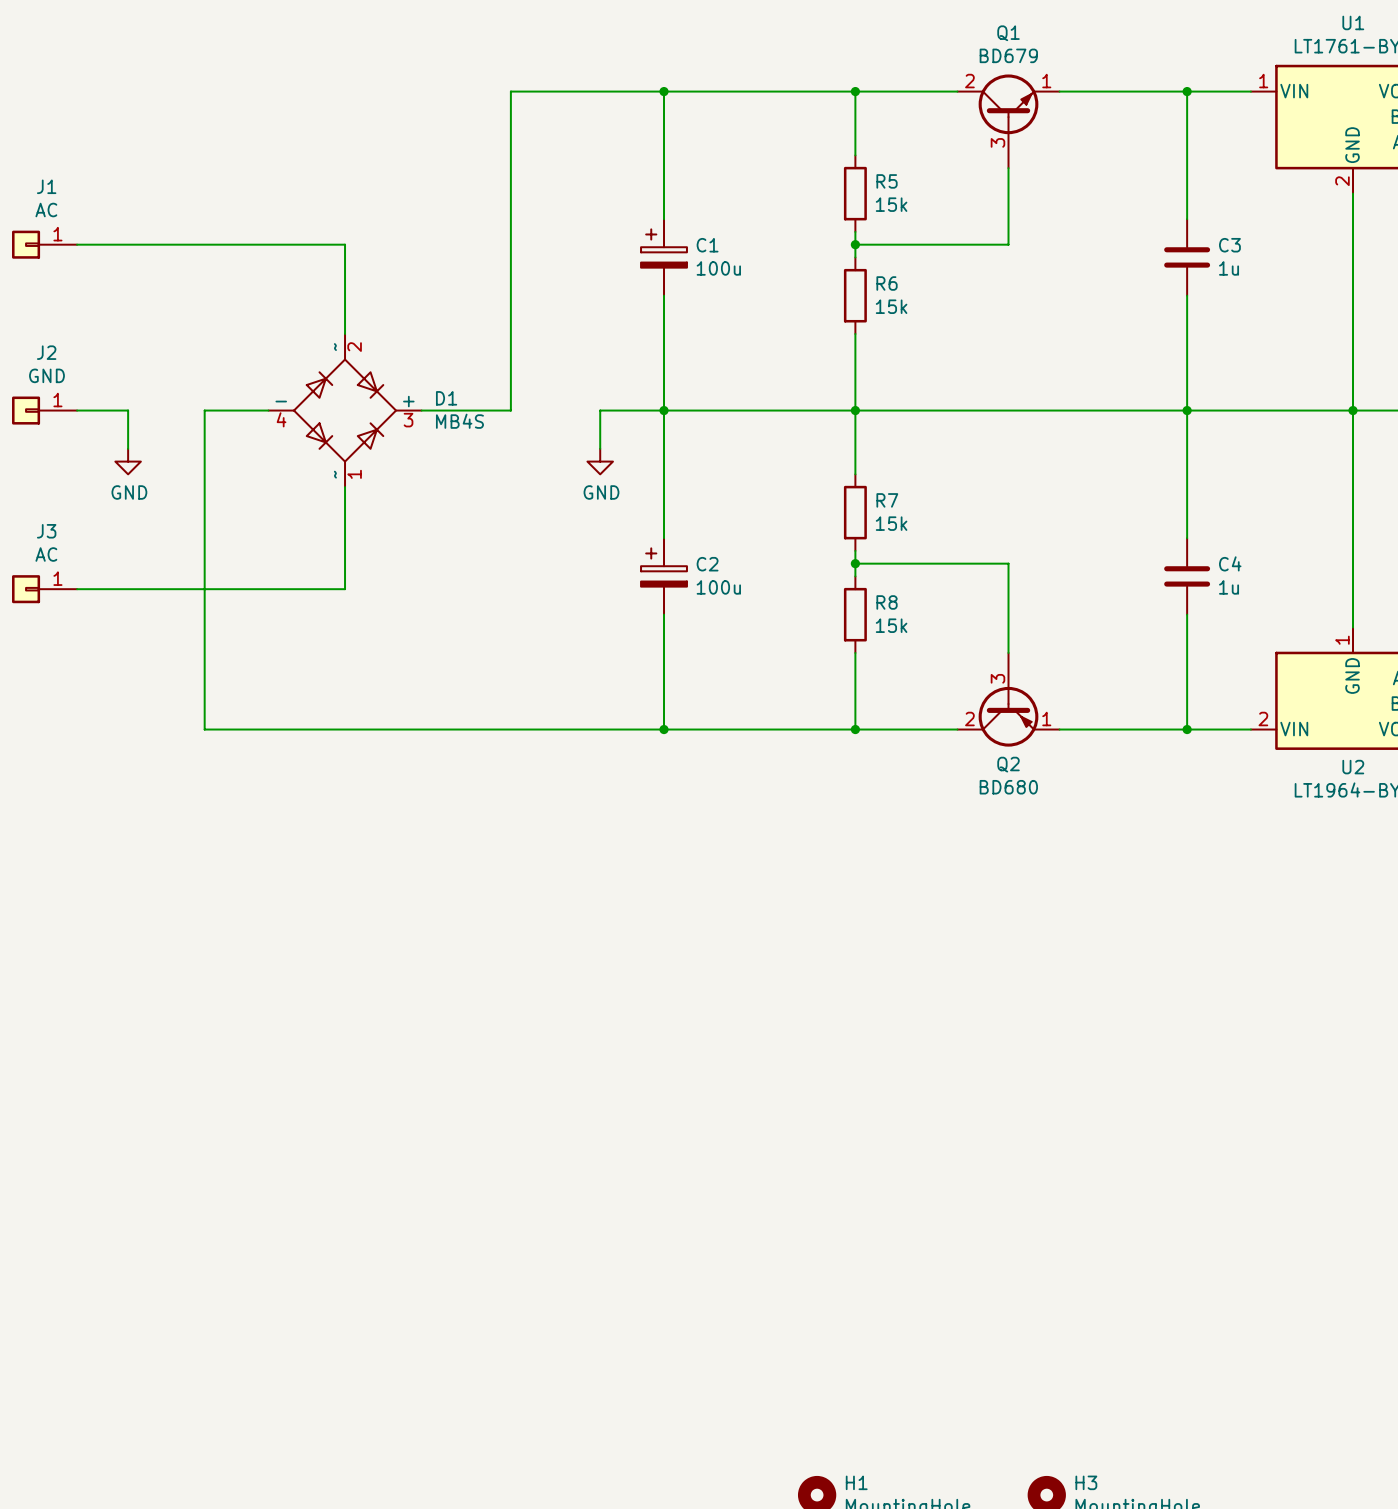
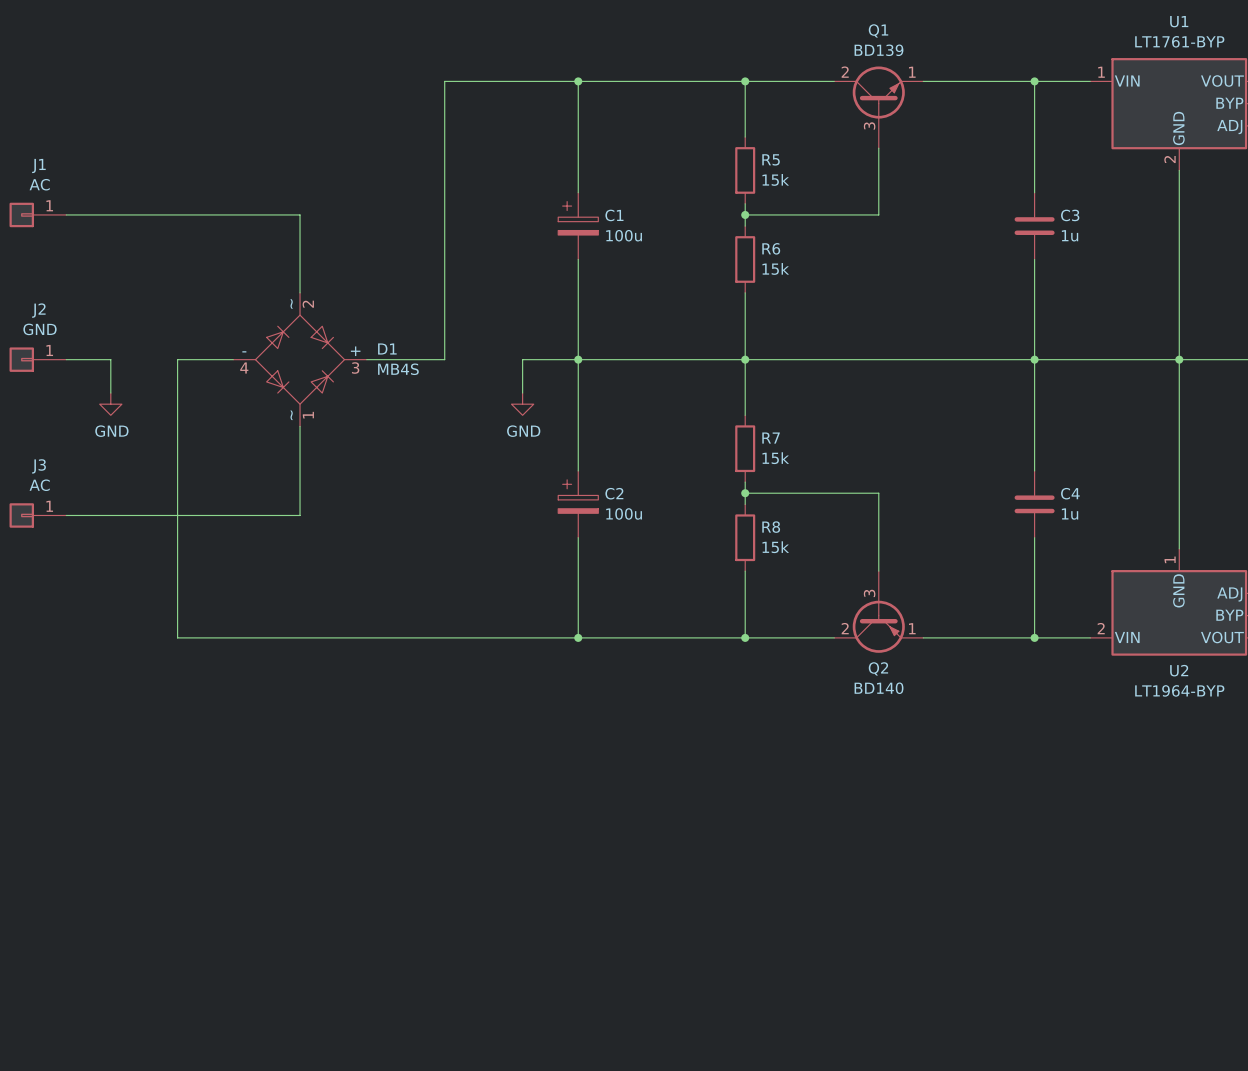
Q1 value: BD679 (1008, 55) -> BD139 (878, 50)
Q2 value: BD680 (1008, 787) -> BD140 (879, 688)

